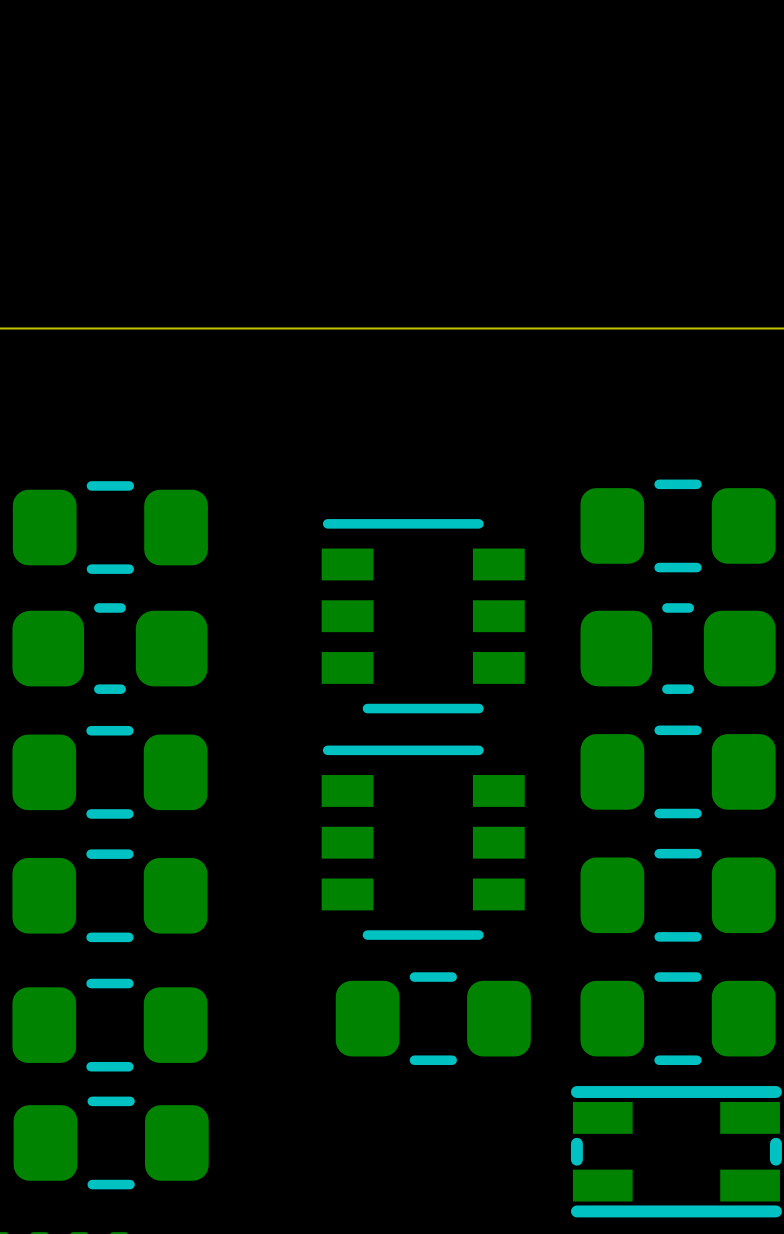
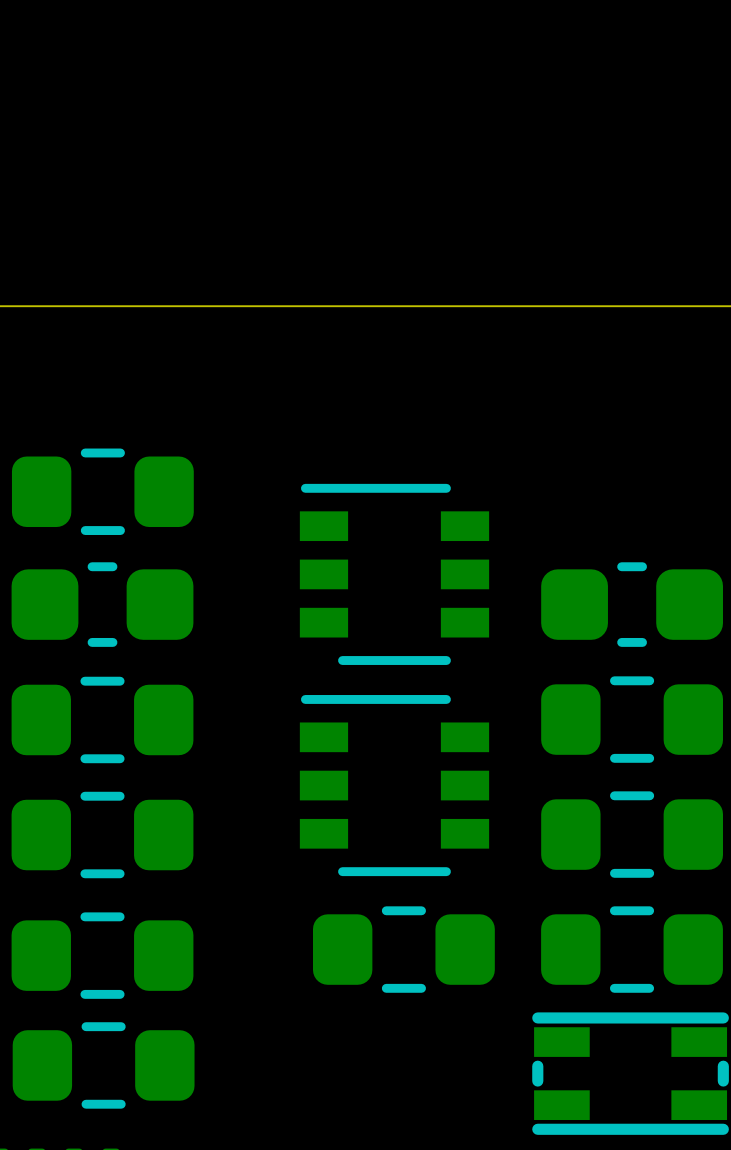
part: (678, 525) -> none

